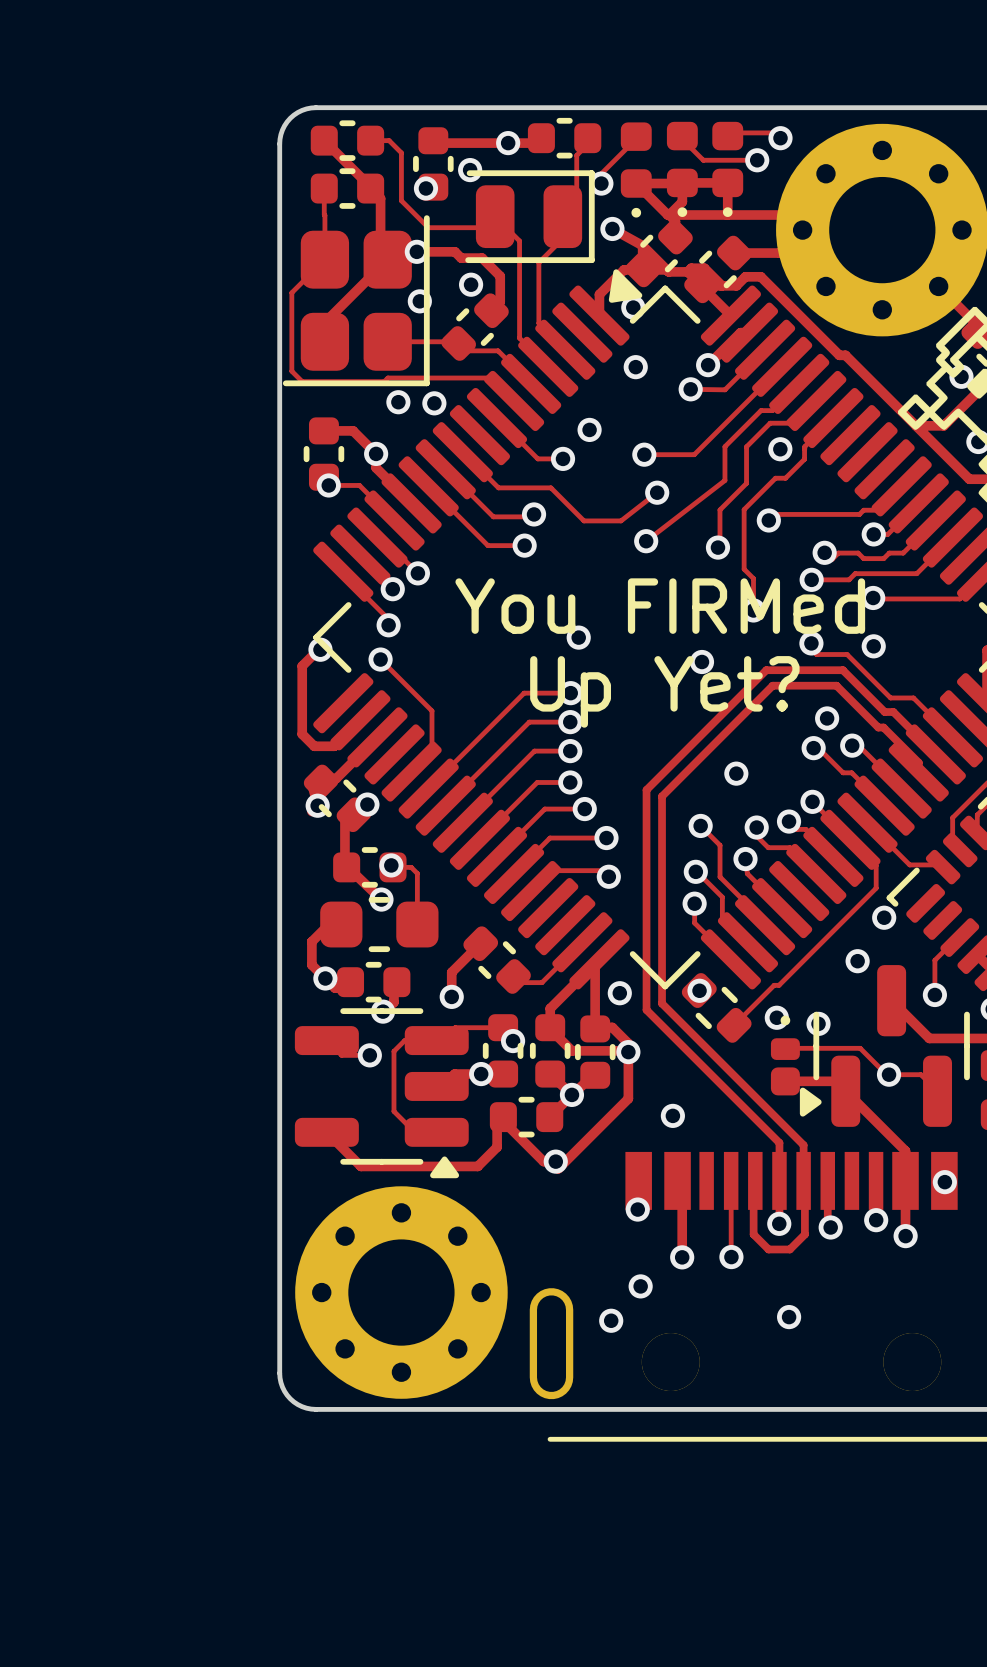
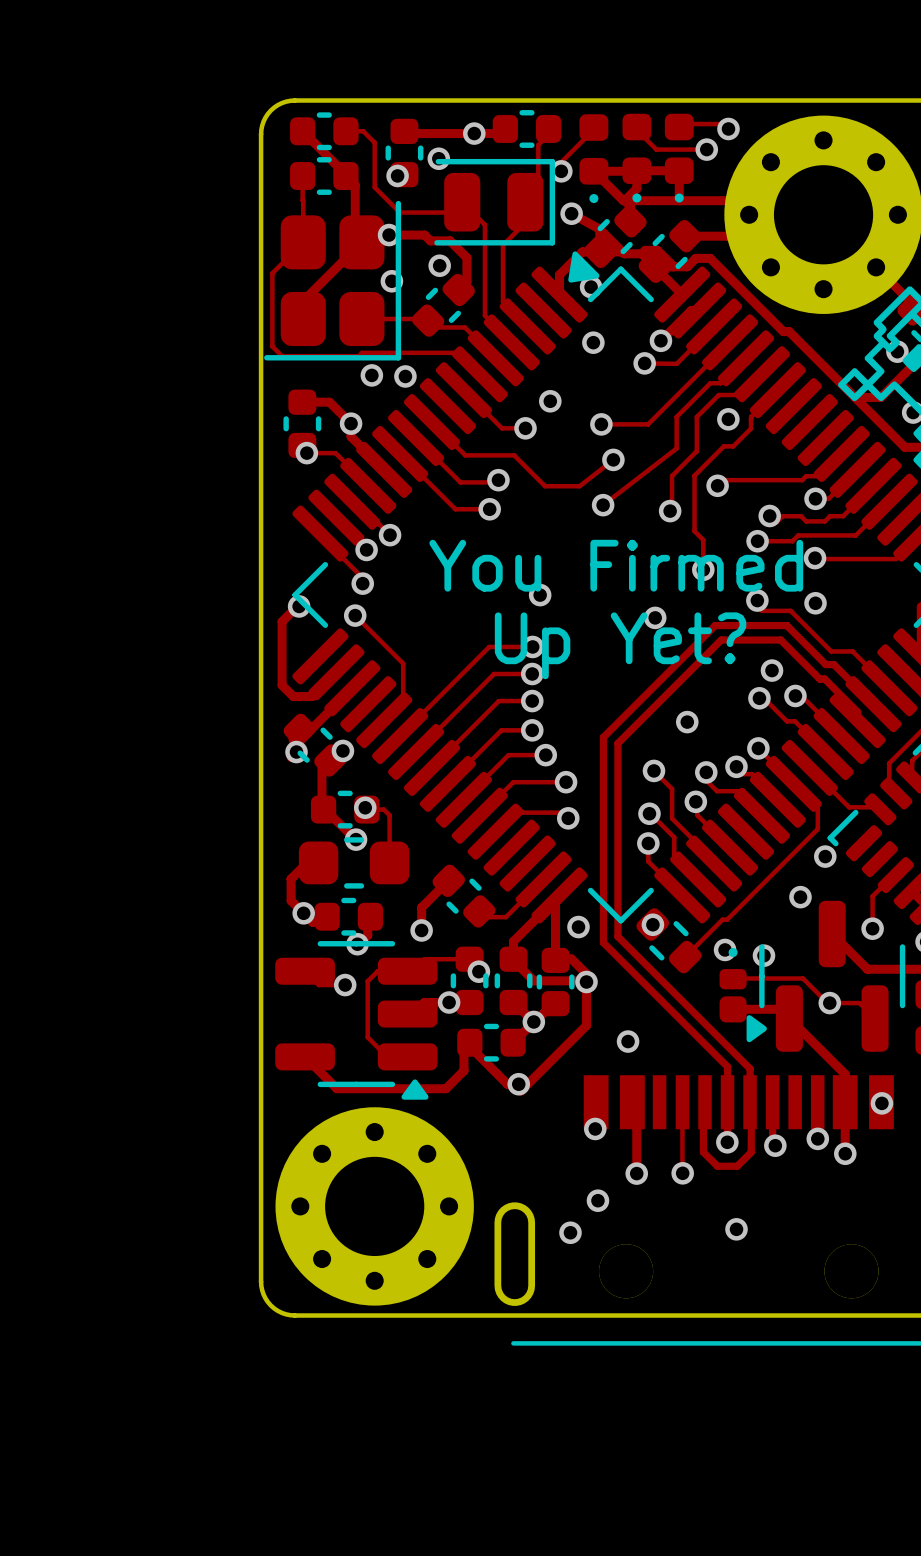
text: You FIRMed (660, 606) -> You Firmed (616, 565)

